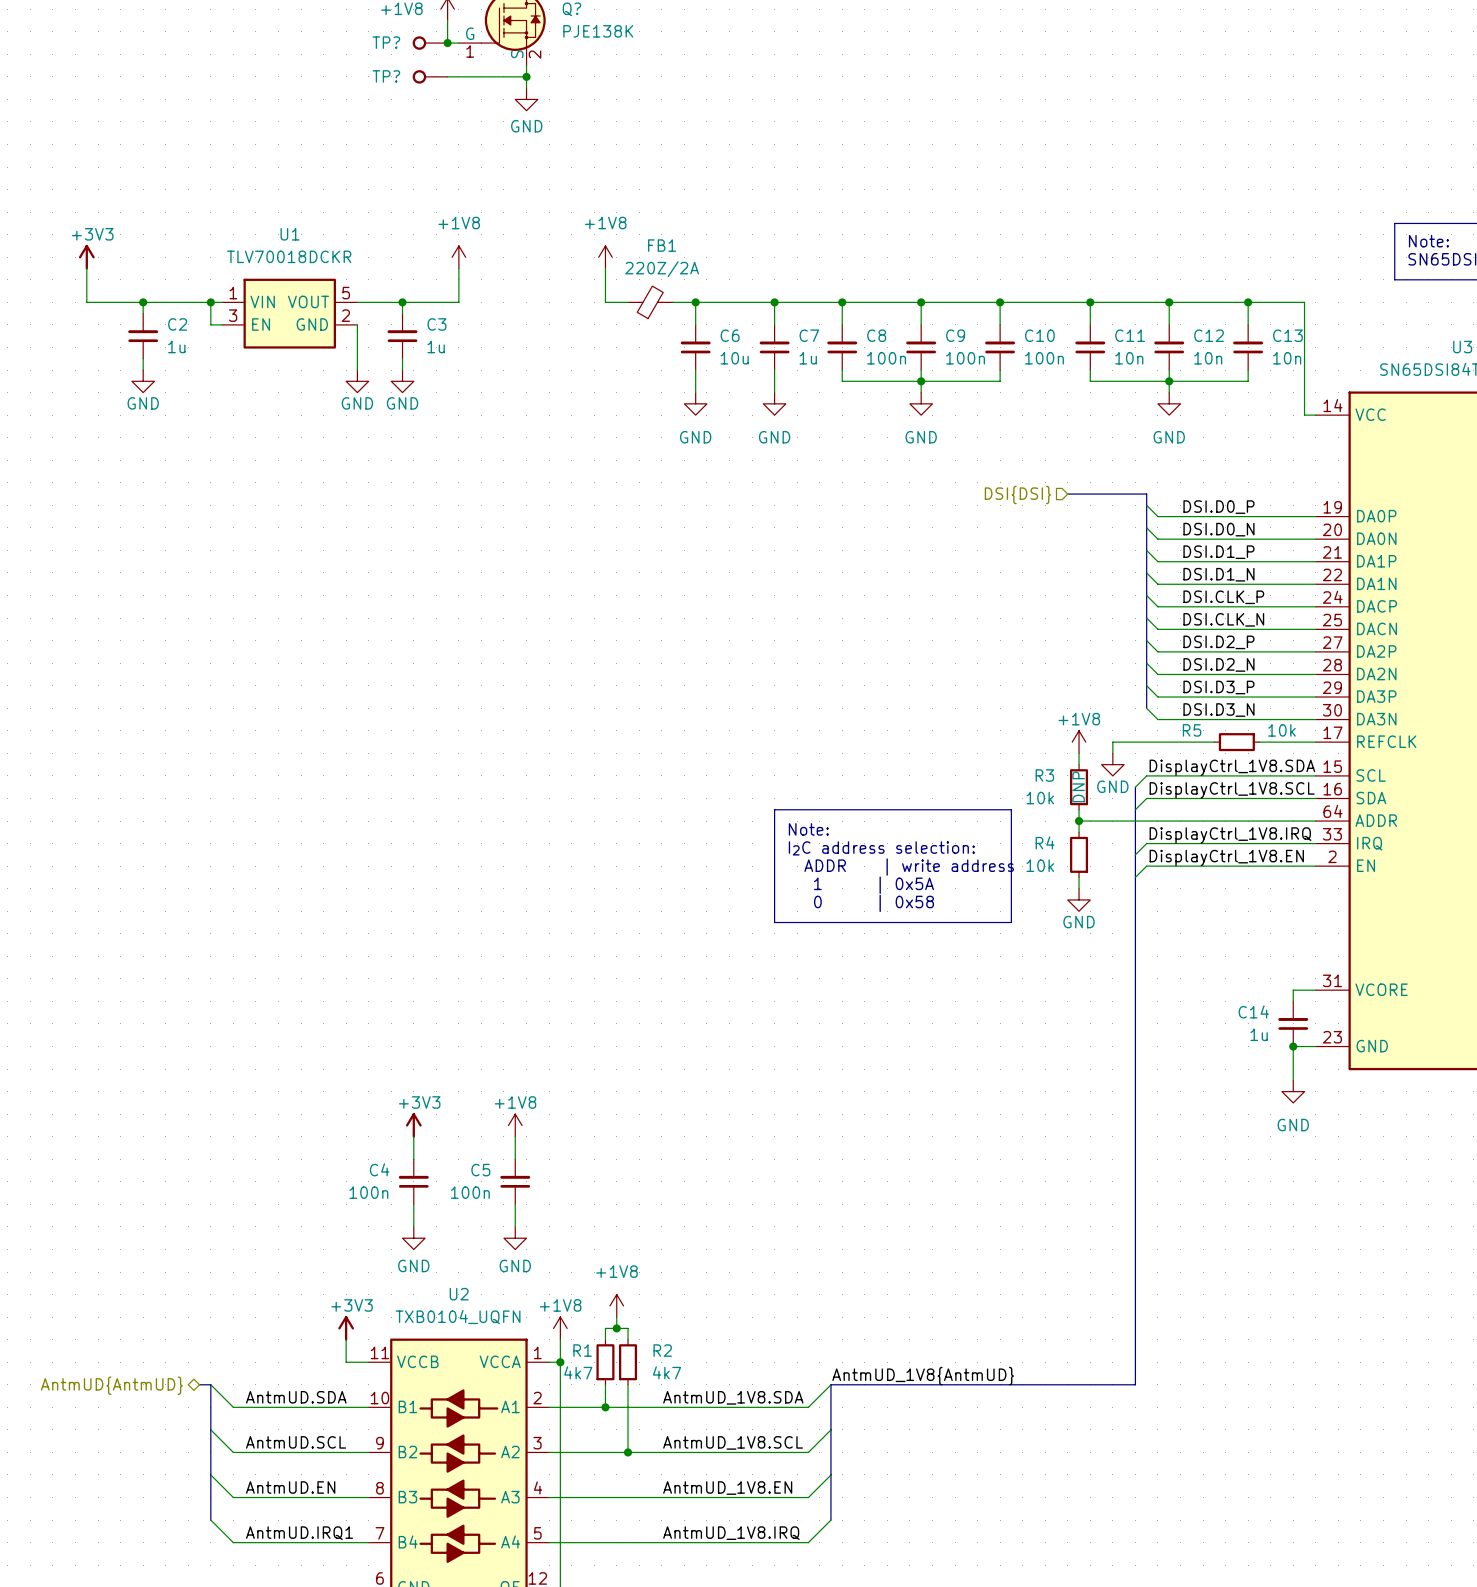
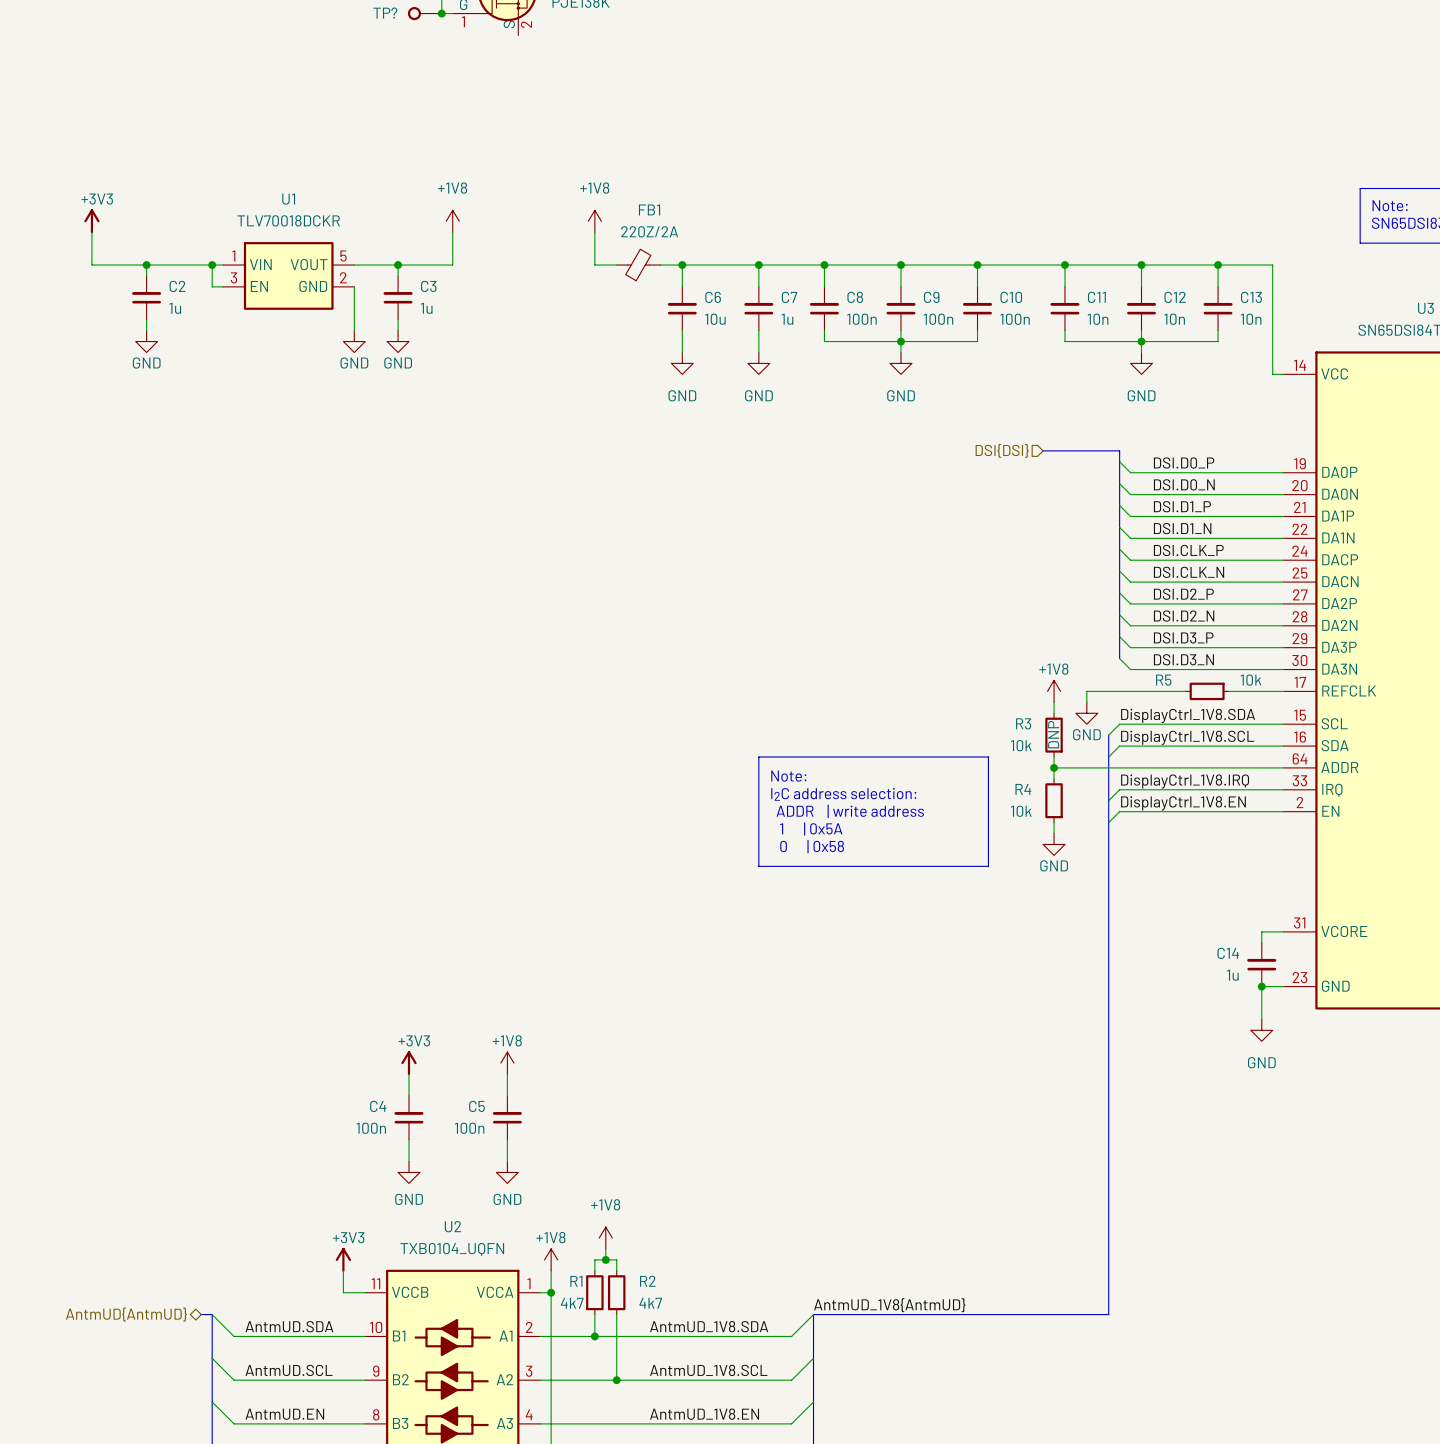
wire: (526, 65) (526, 88) -> none
TP?: (430, 76) -> none
wire: (447, 76) (526, 76) -> none
junction: (526, 76) -> none
power symbol: GND (526, 99) -> none

